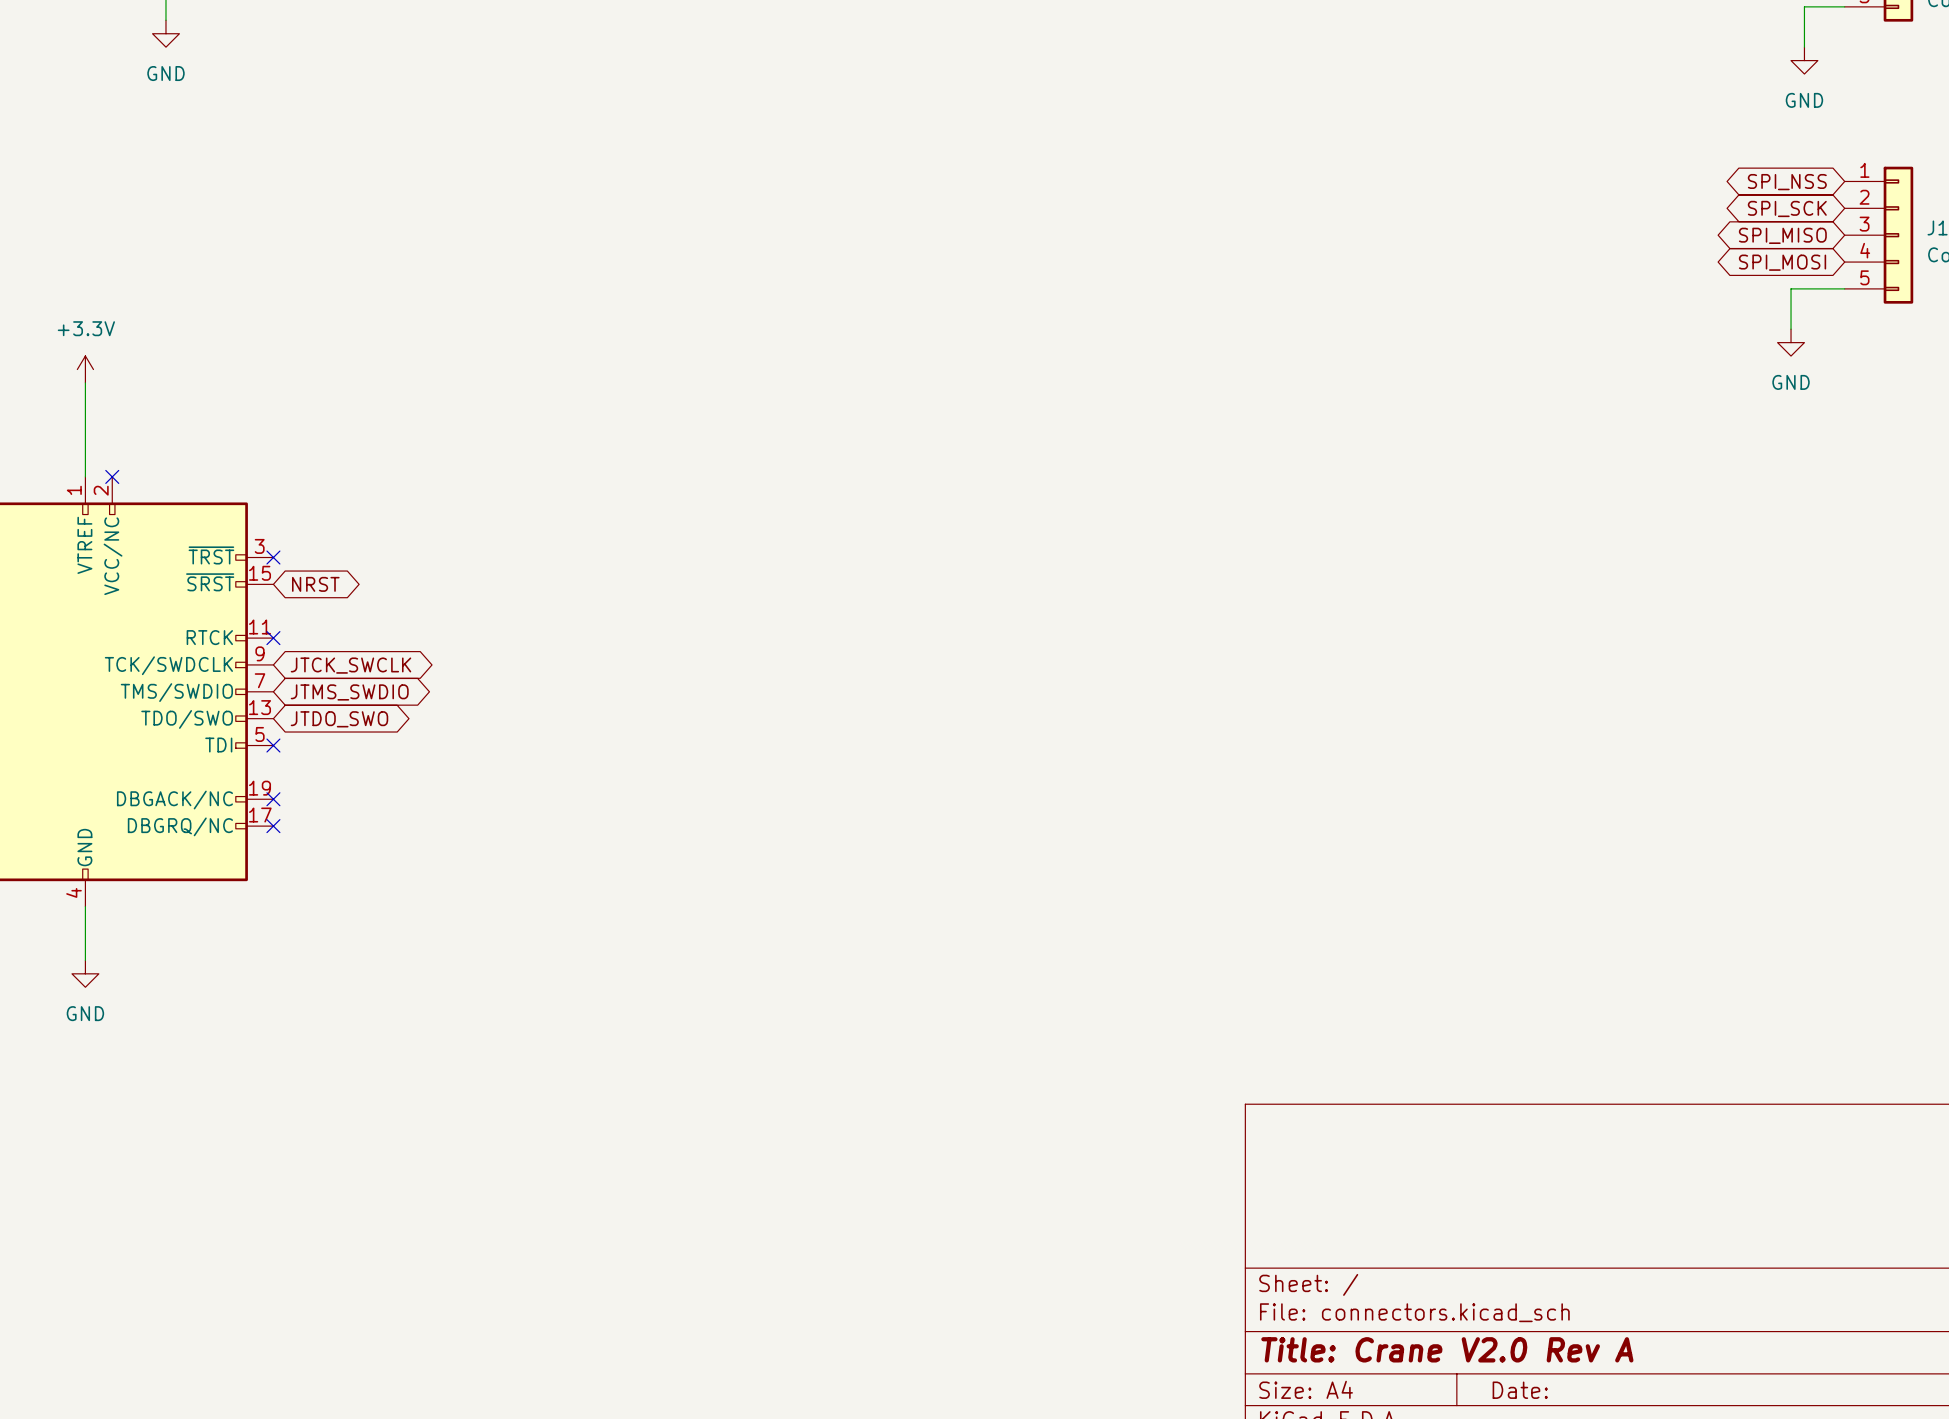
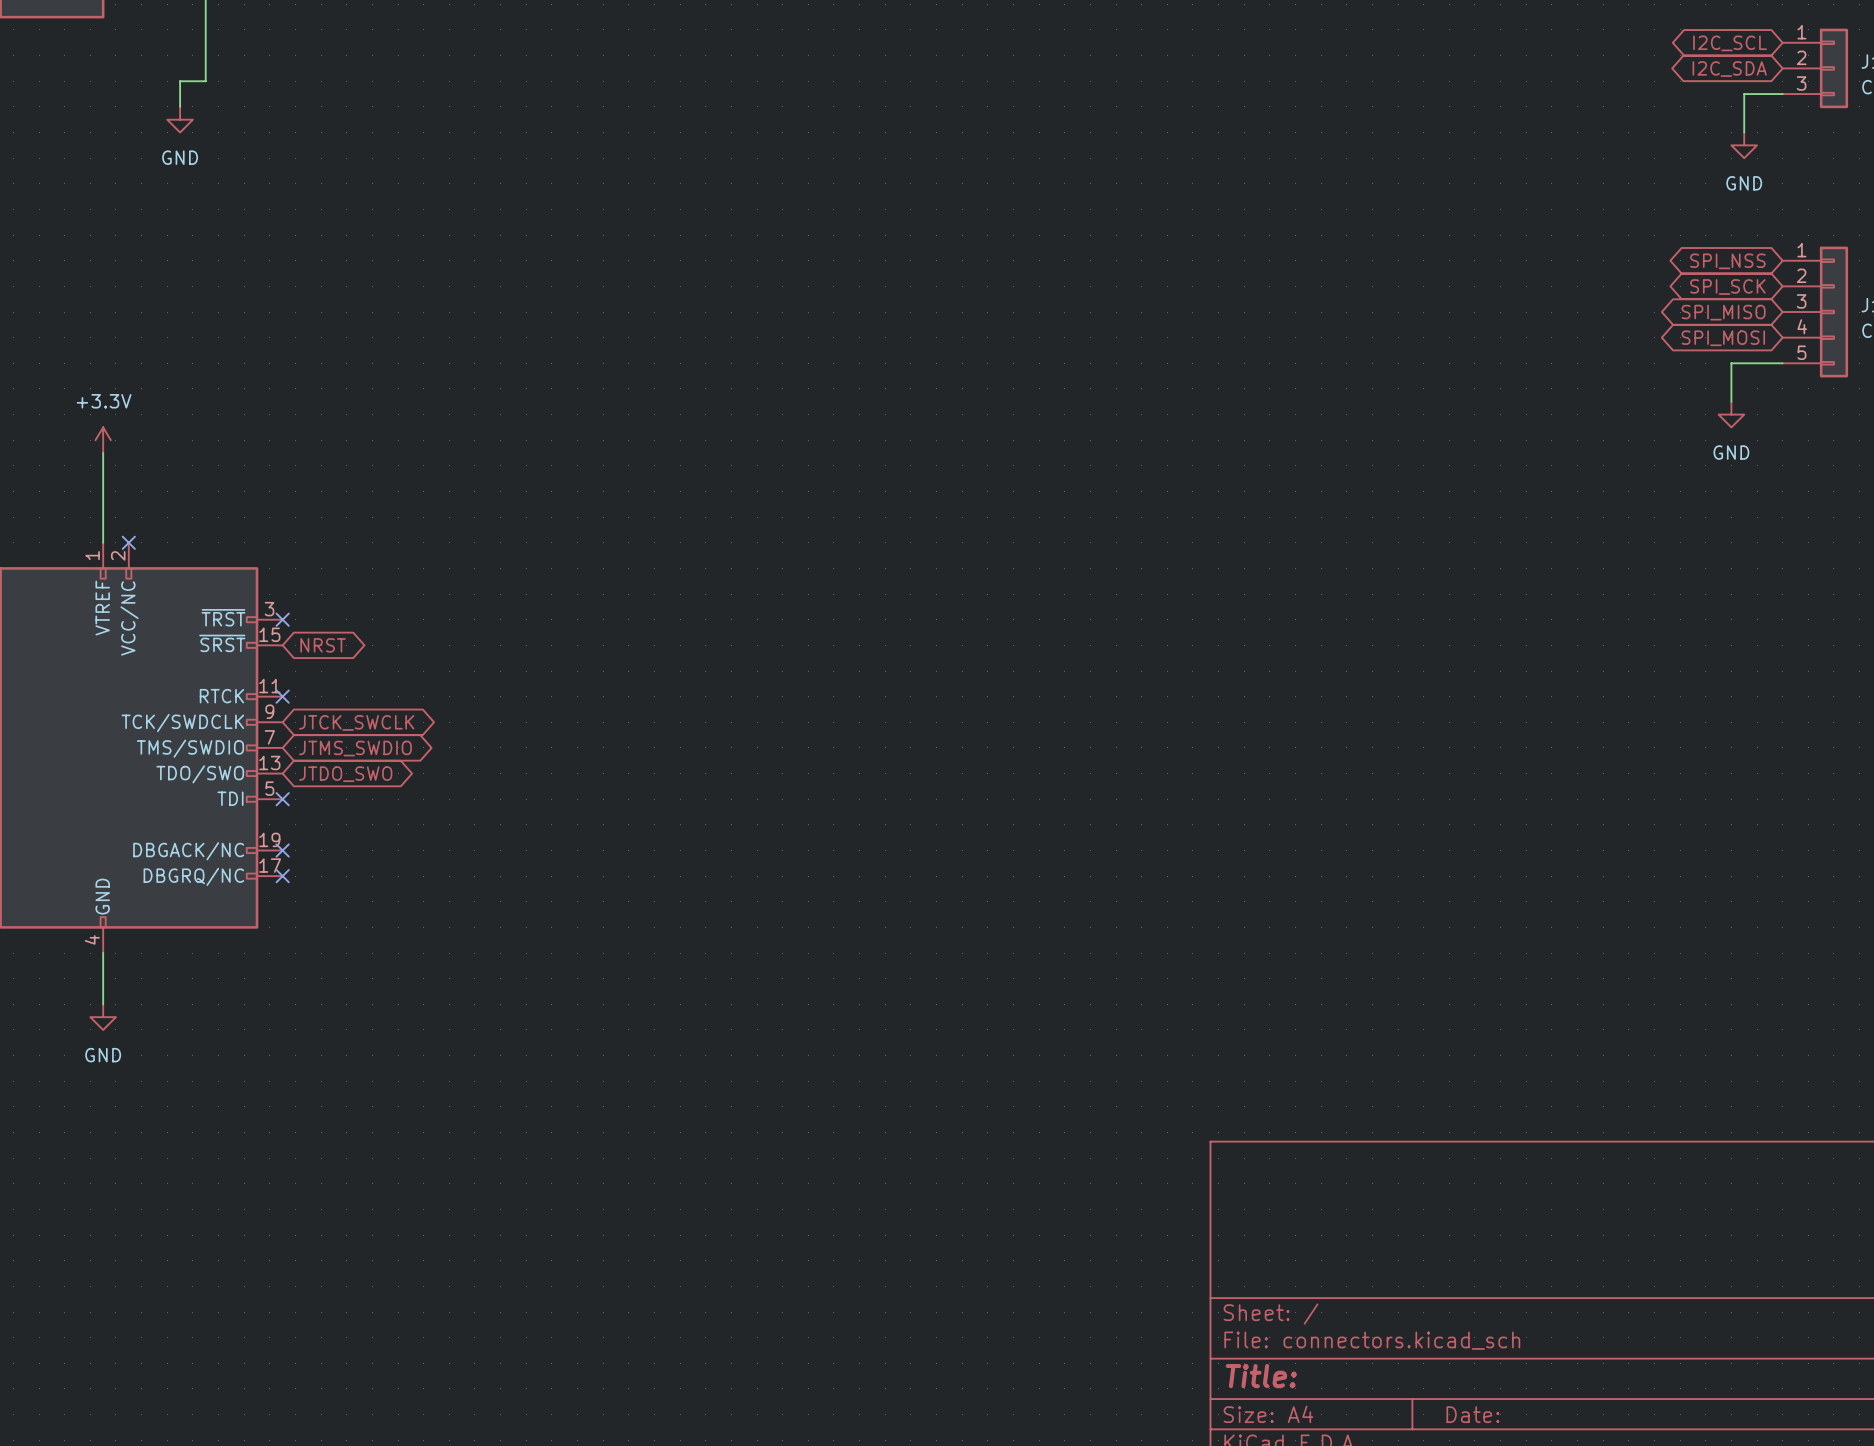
title block: Title: Crane V2.0 Rev A (1447, 1349) -> Title: (1261, 1376)

